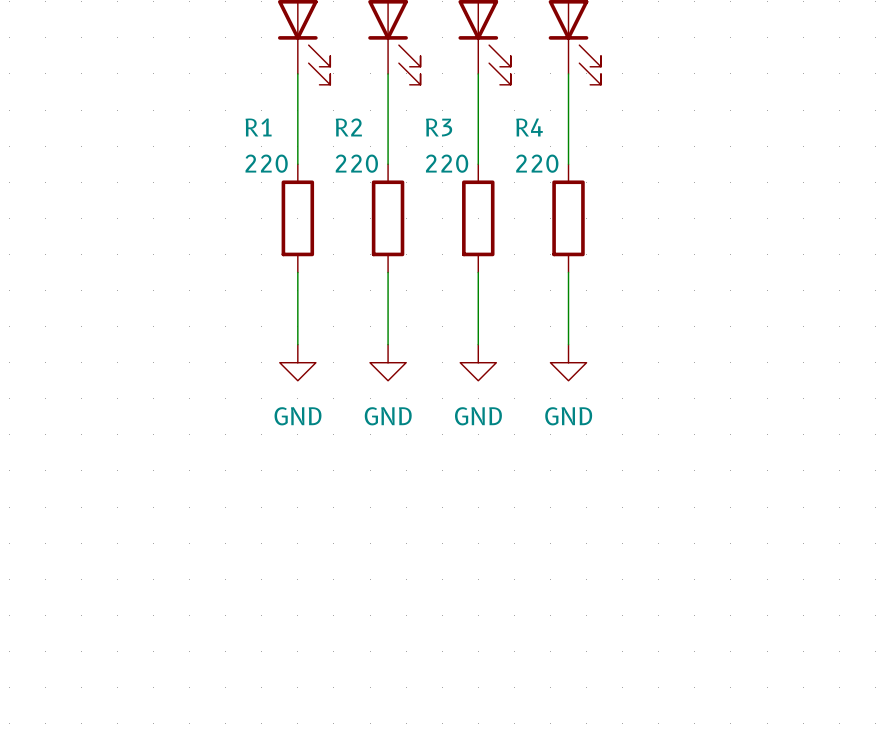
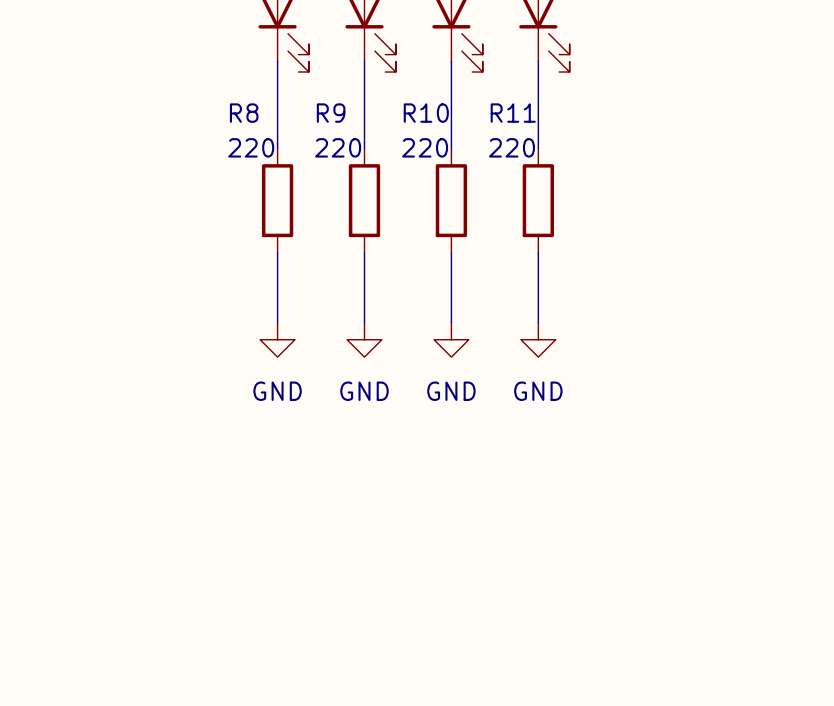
R1 name: R1 (258, 127) -> R8 (244, 113)
R2 name: R2 (348, 127) -> R9 (331, 113)
R3 name: R3 (439, 127) -> R10 (426, 113)
R4 name: R4 (529, 127) -> R11 (513, 113)

